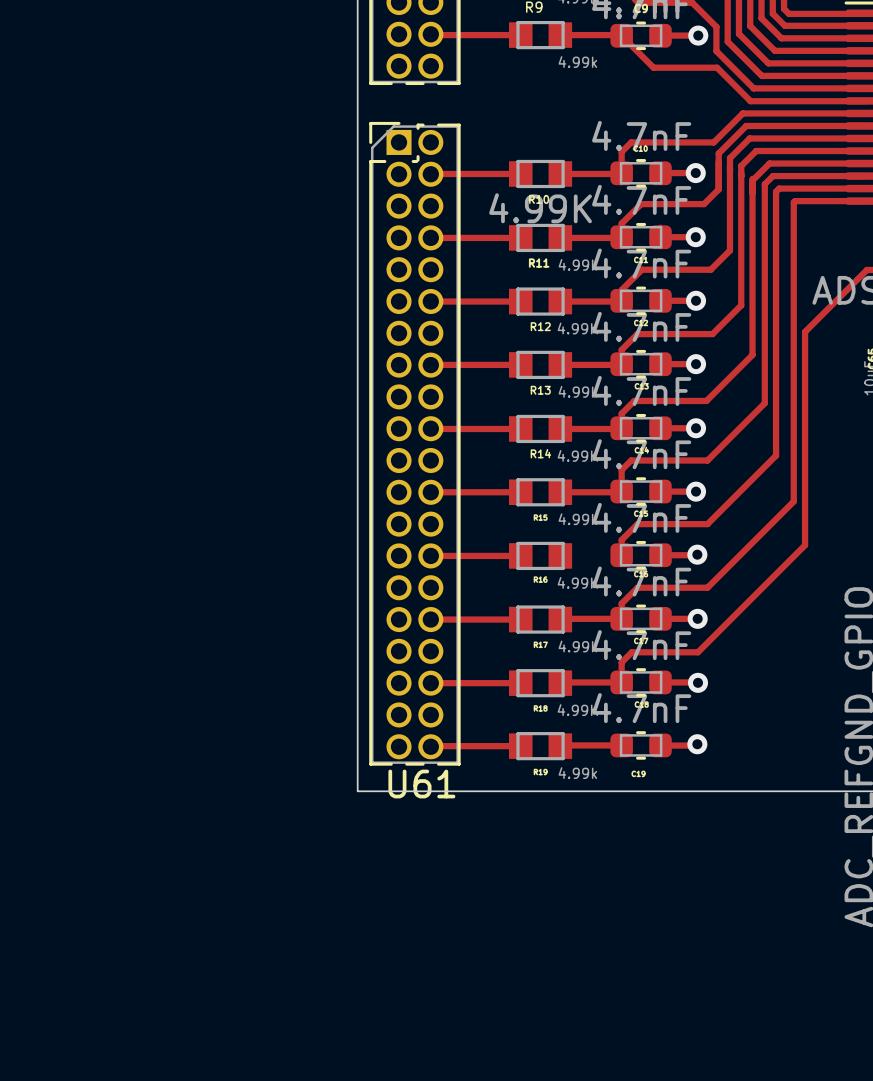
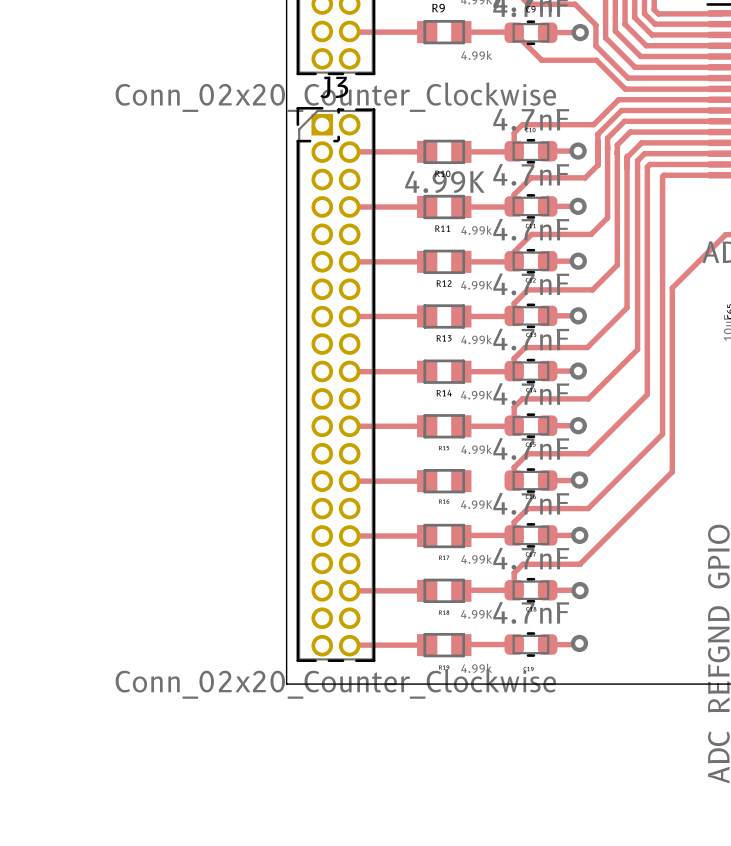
part value: none -> Conn_02x20_Counter_Clockwise (335, 97)
U61 name: U61 (421, 784) -> J3 (334, 87)
U61 value: none -> Conn_02x20_Counter_Clockwise (335, 683)

